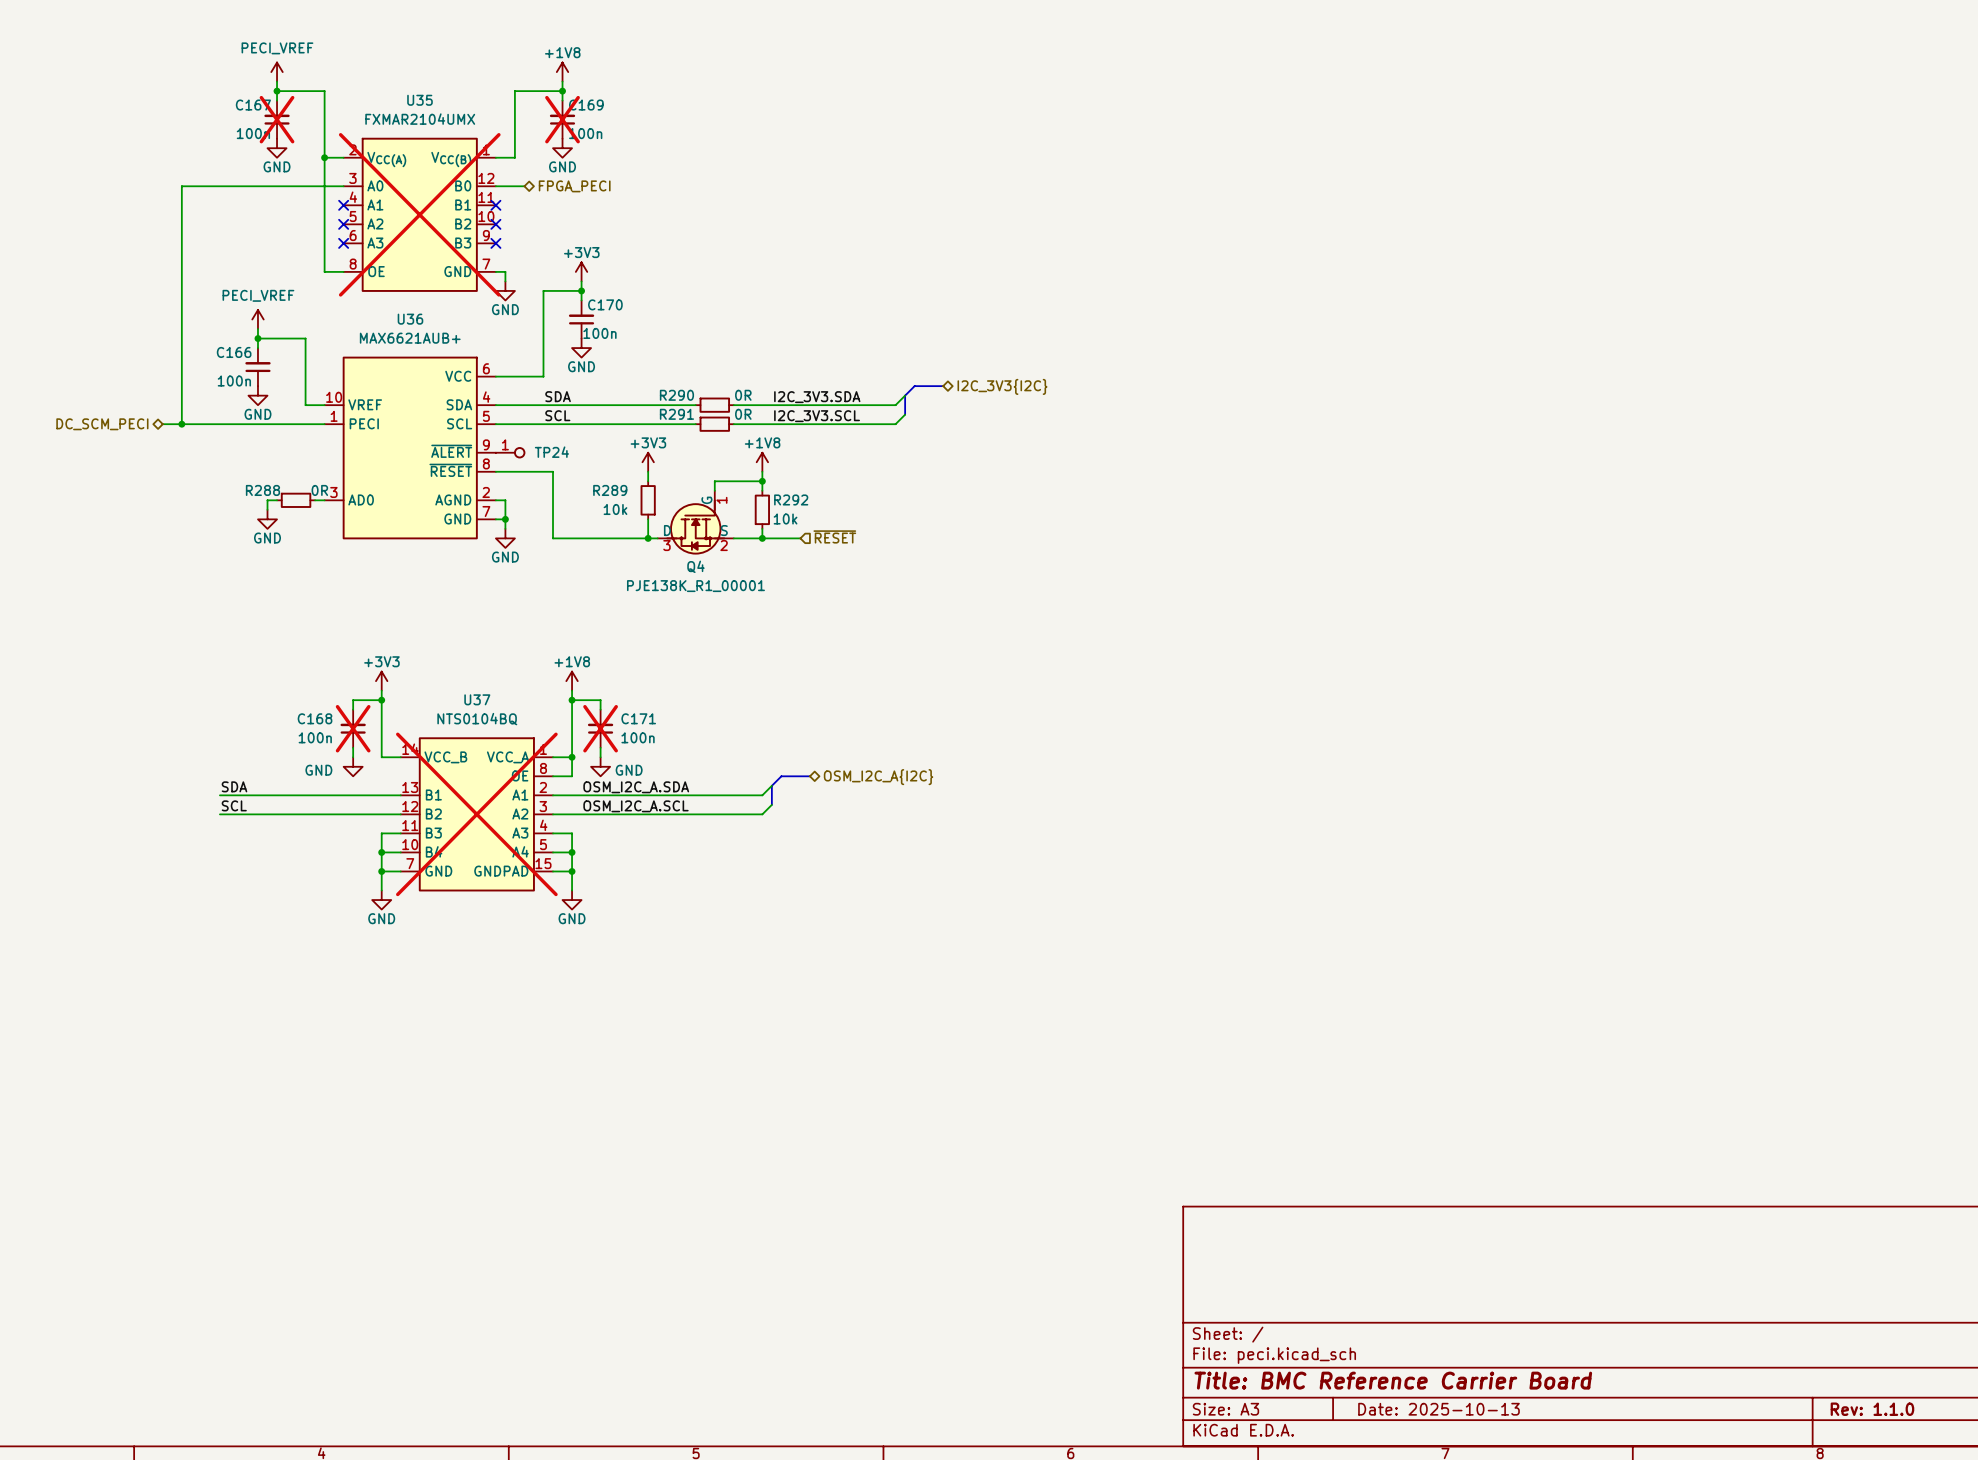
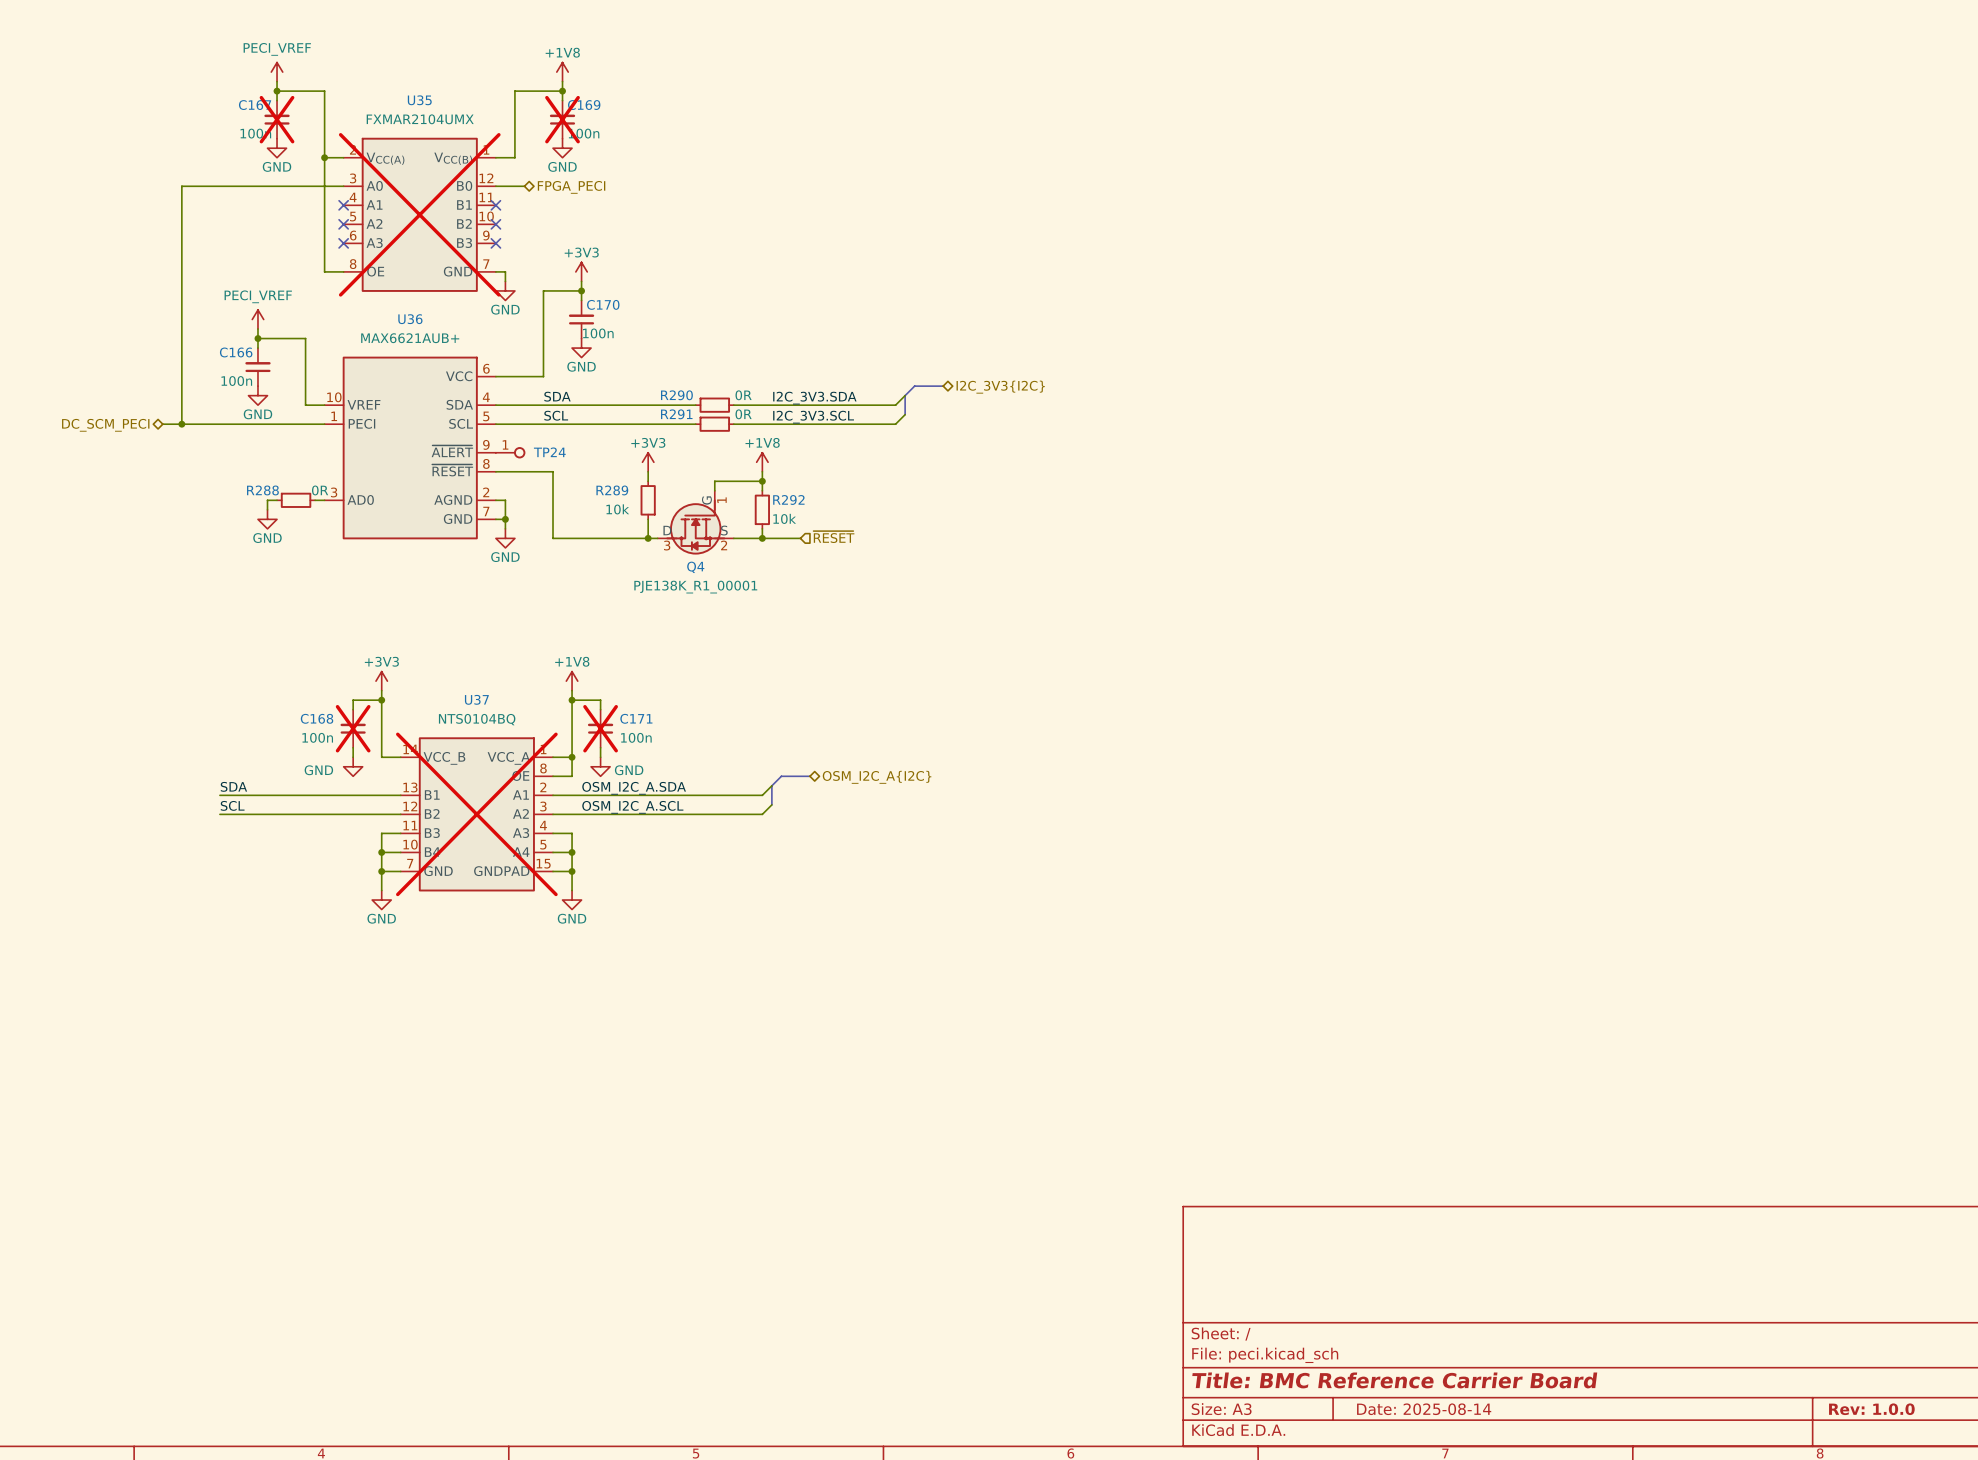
title block: Date: 2025-10-13 (1438, 1409) -> Date: 2025-08-14 (1424, 1409)
title block: Rev: 1.1.0 (1872, 1409) -> Rev: 1.0.0 (1871, 1409)

